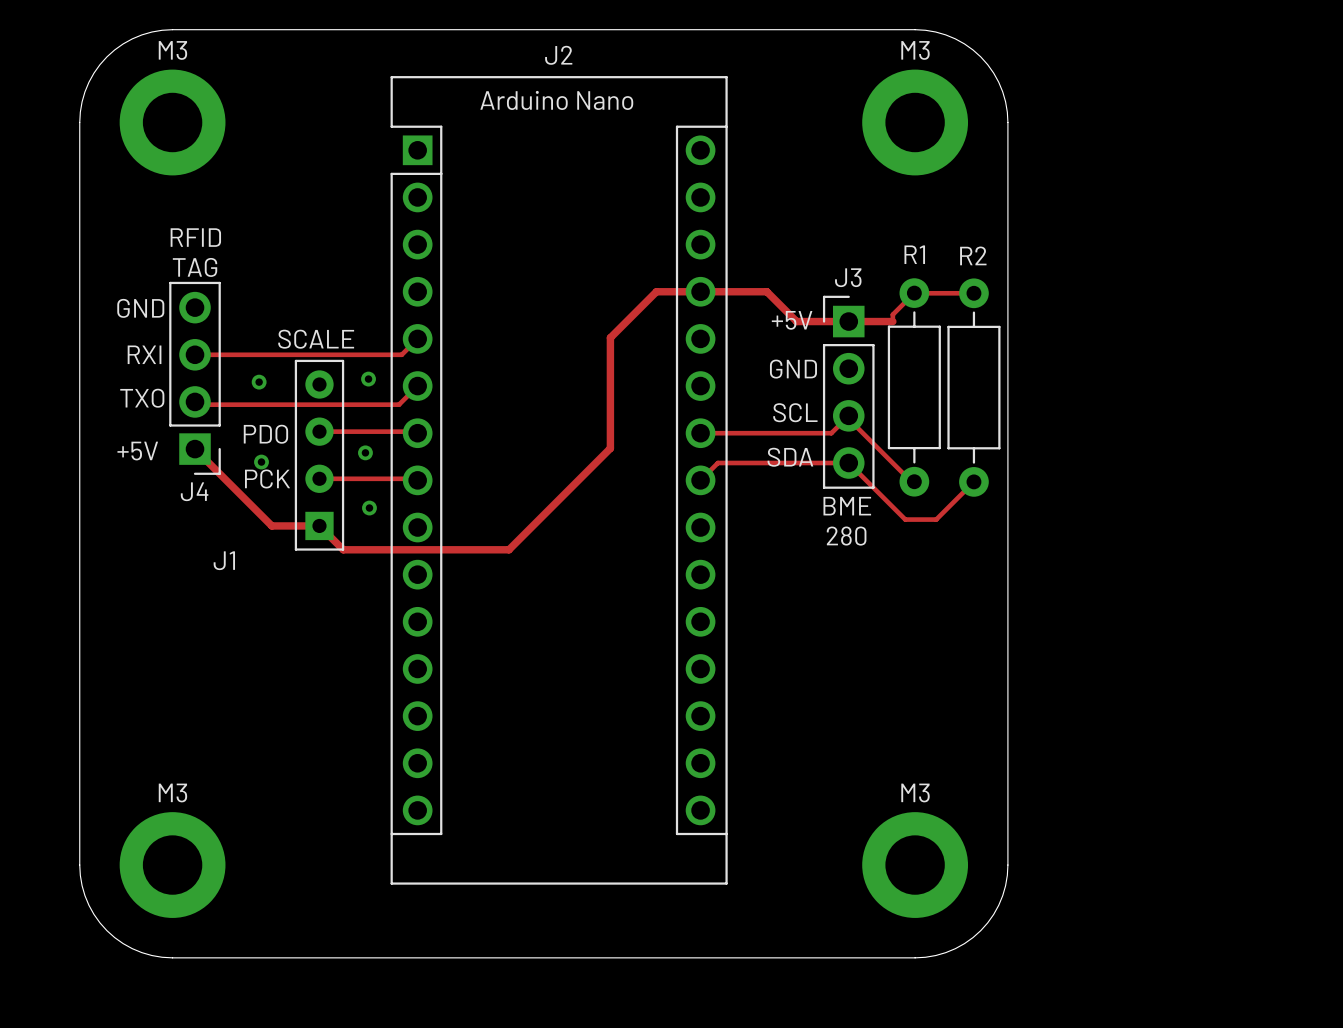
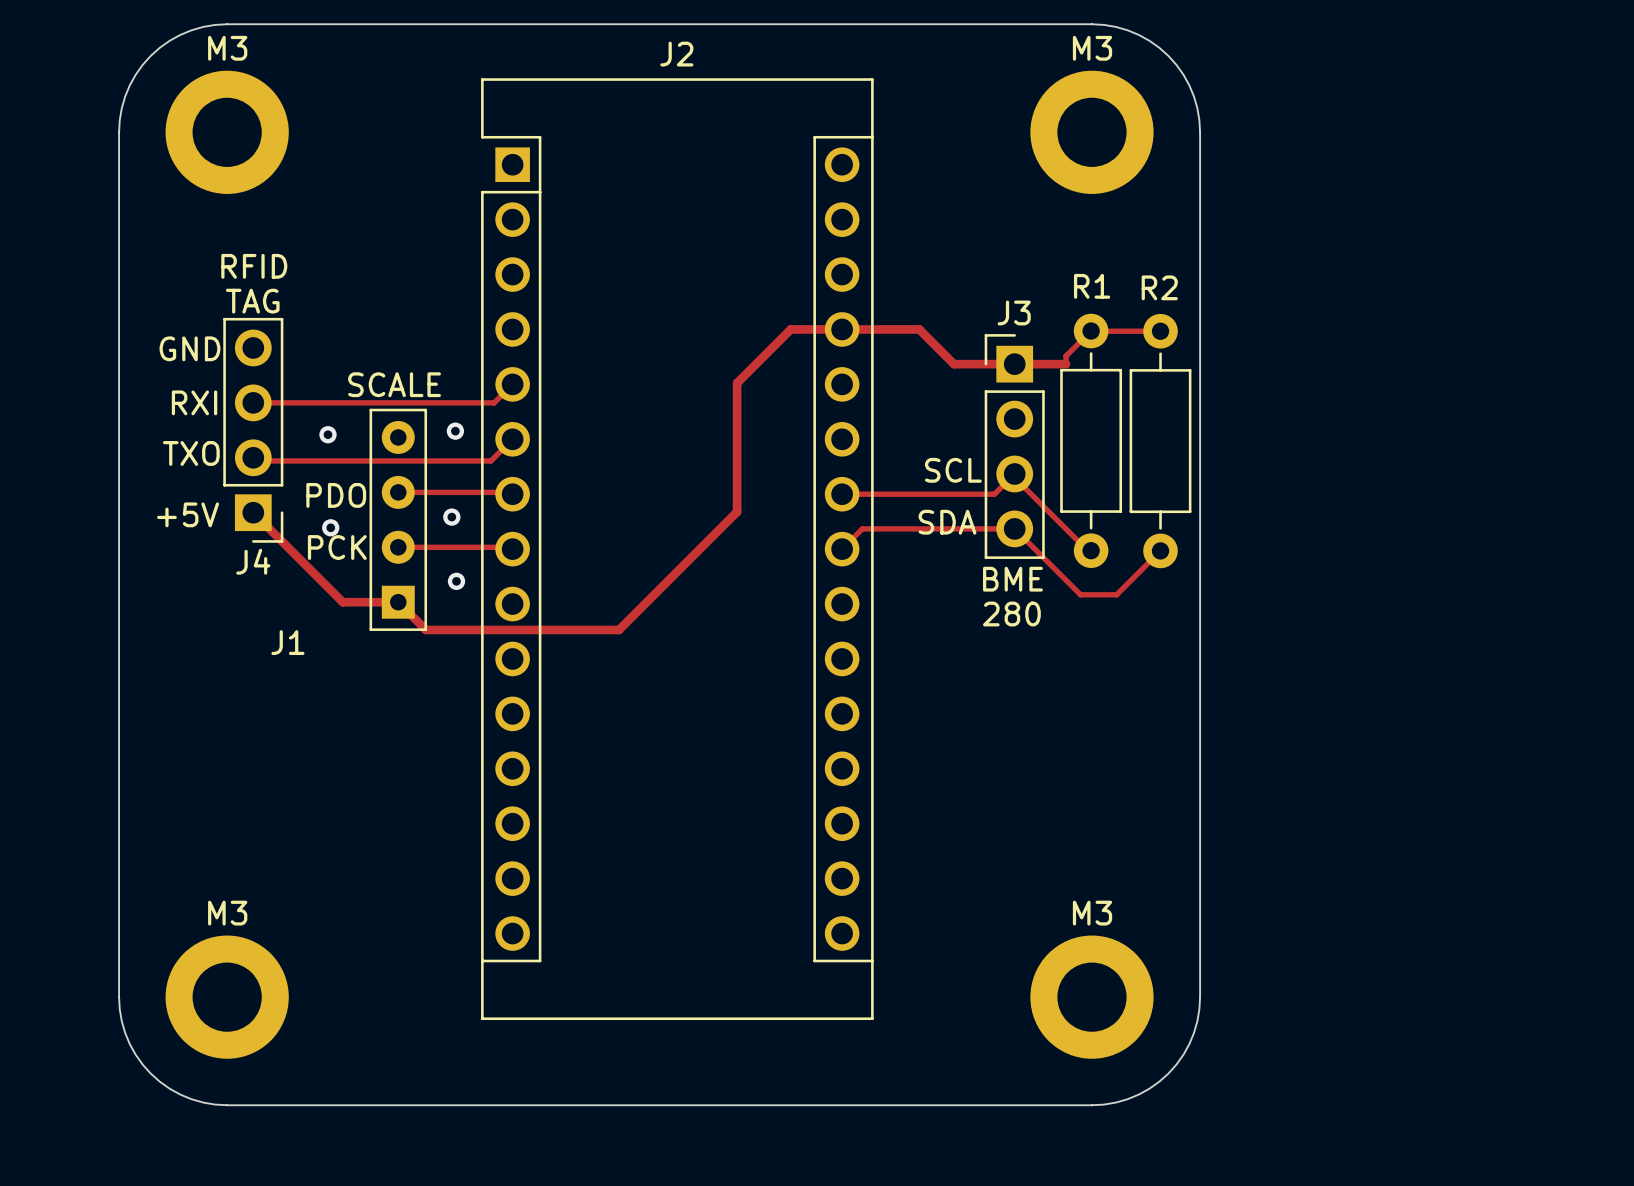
text: Arduino Nano (556, 100) -> none
text: +5V (792, 320) -> none
text: GND (793, 369) -> none

